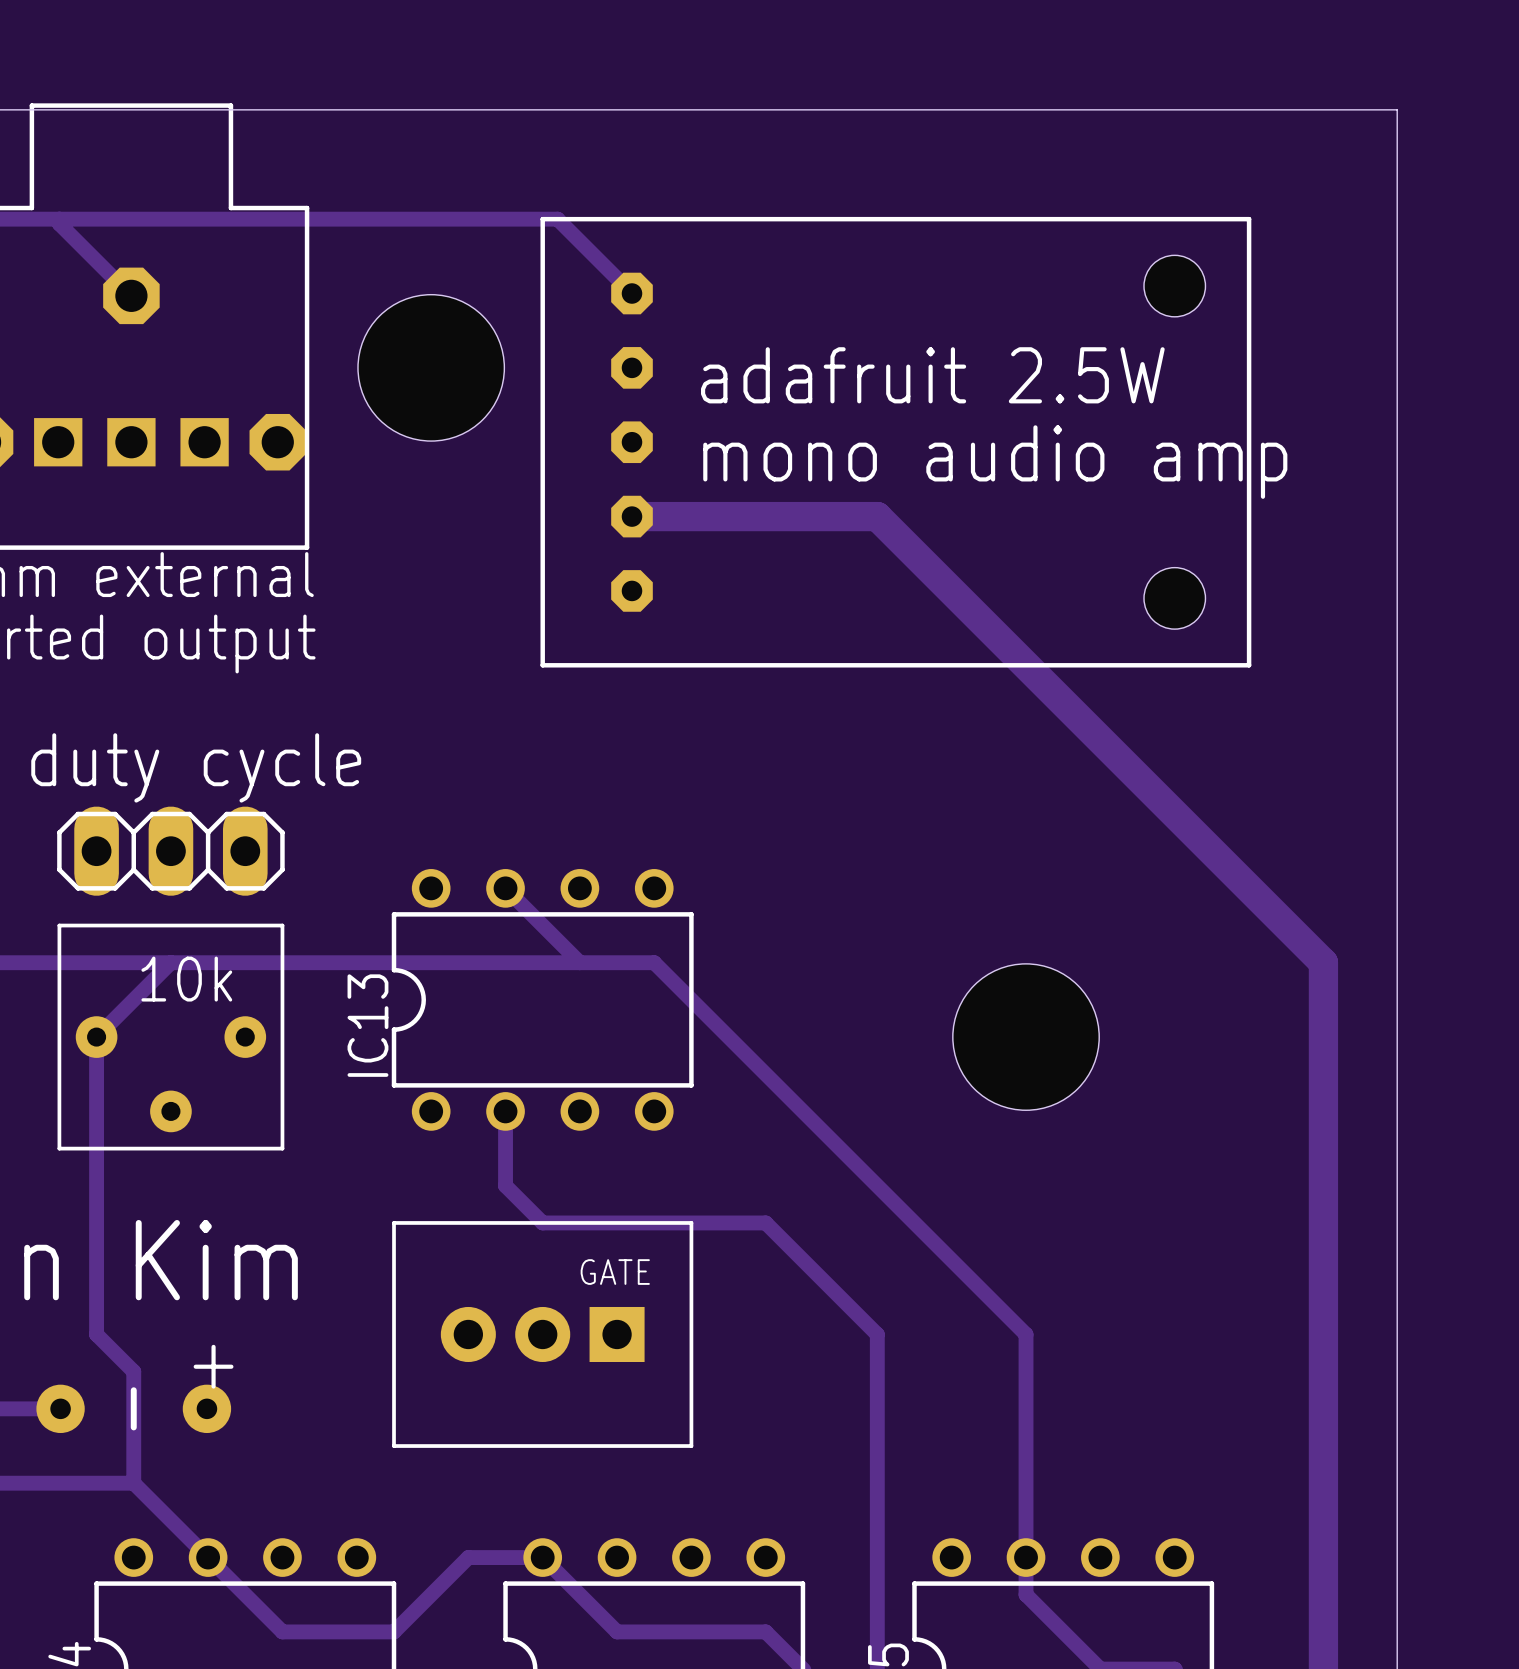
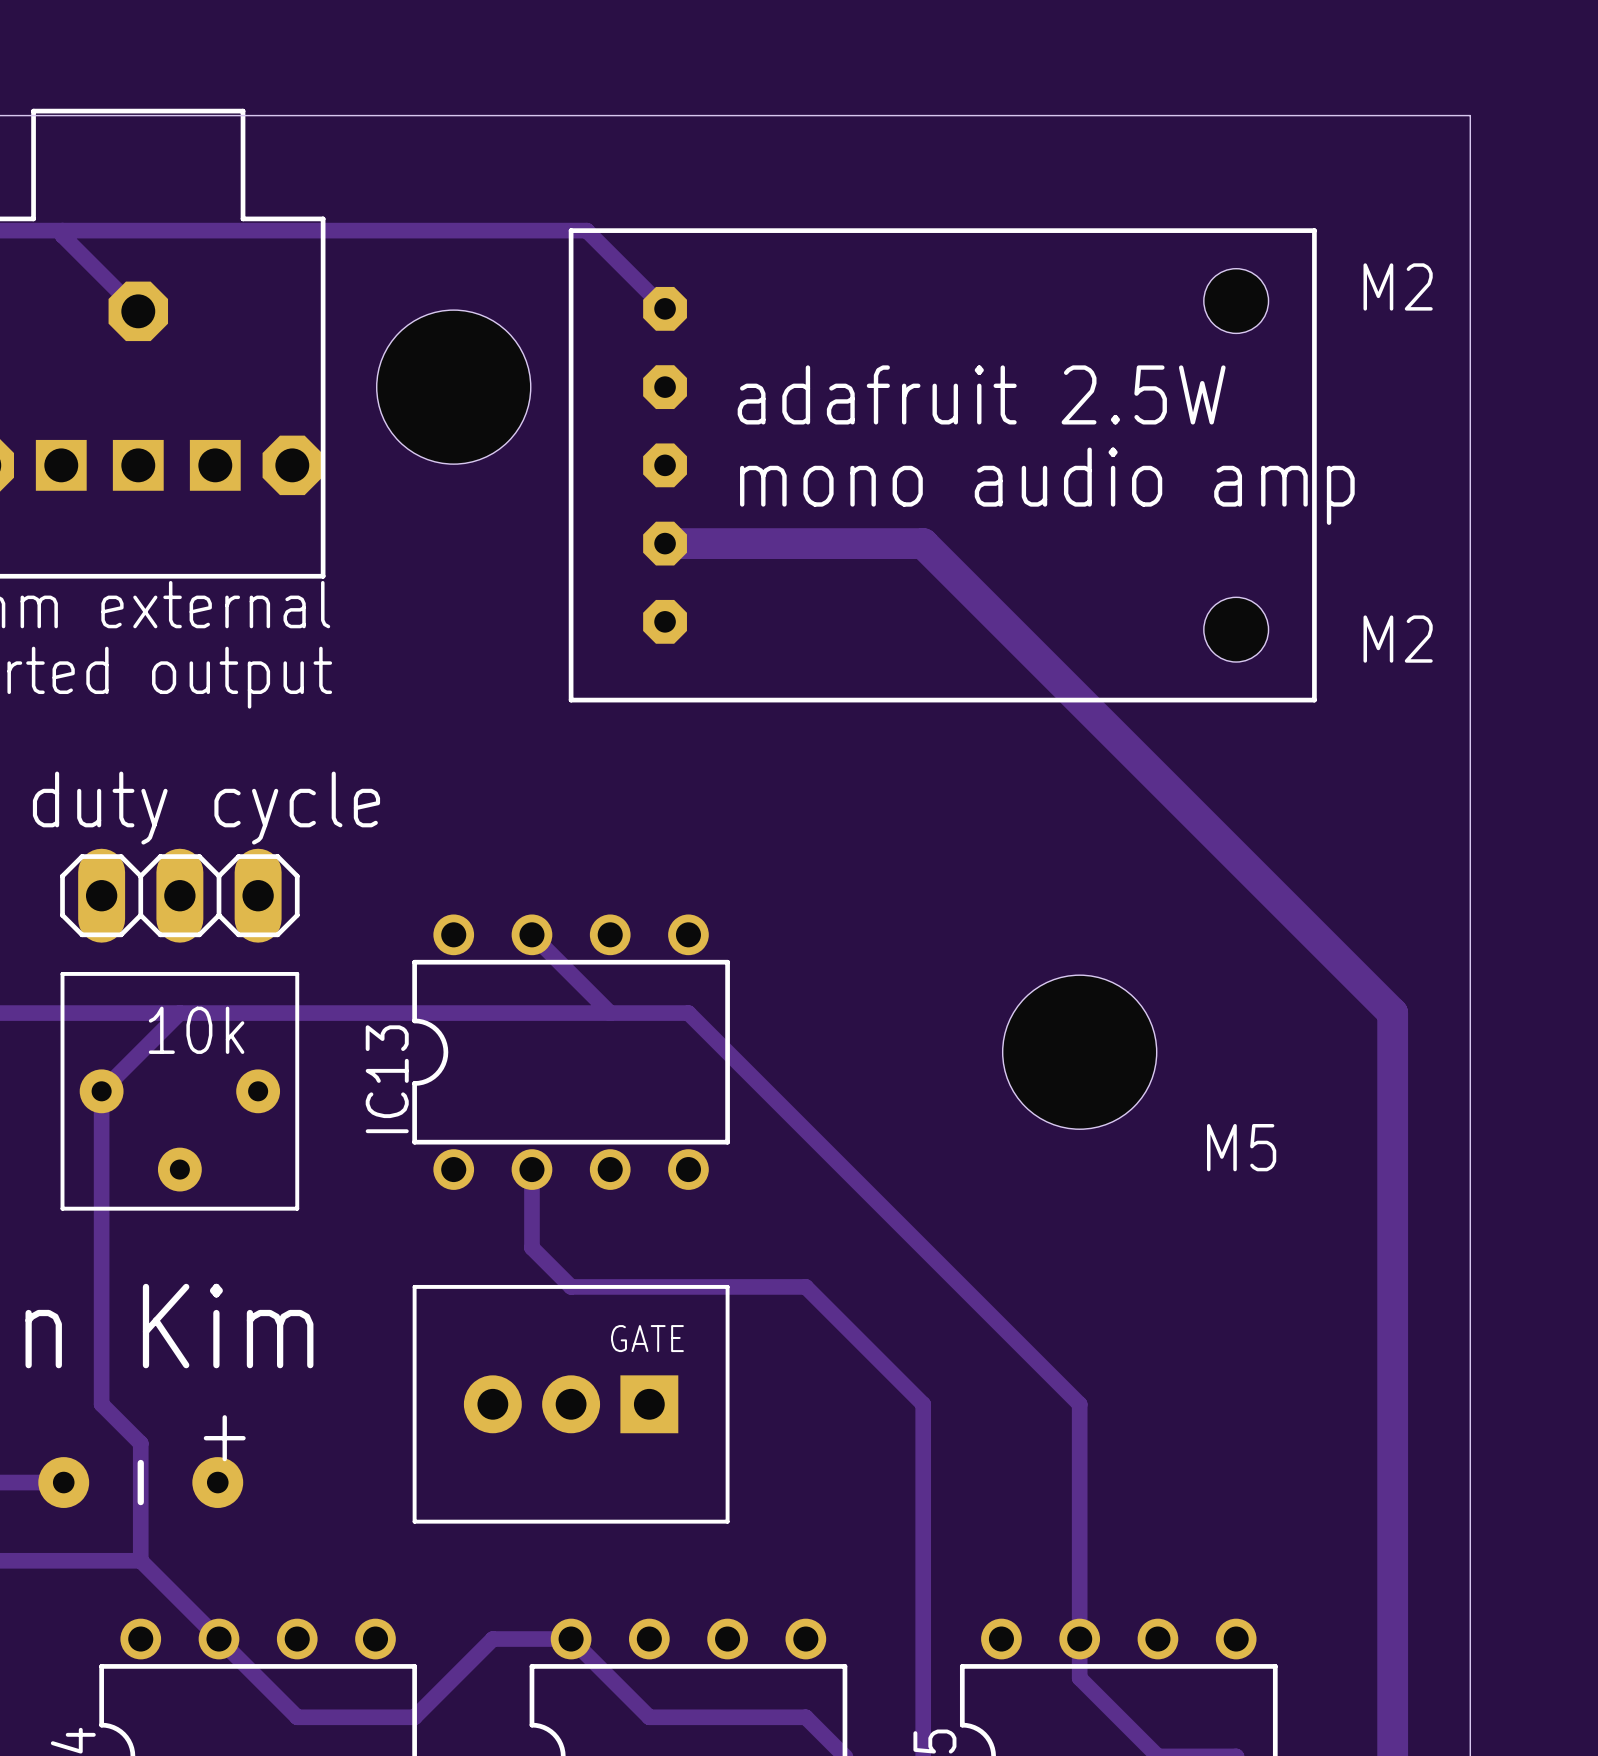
text: none -> M2 (1398, 286)
text: none -> M2 (1398, 639)
hole position: (1026, 1037) -> (1079, 1052)
text: none -> M5 (1241, 1147)

